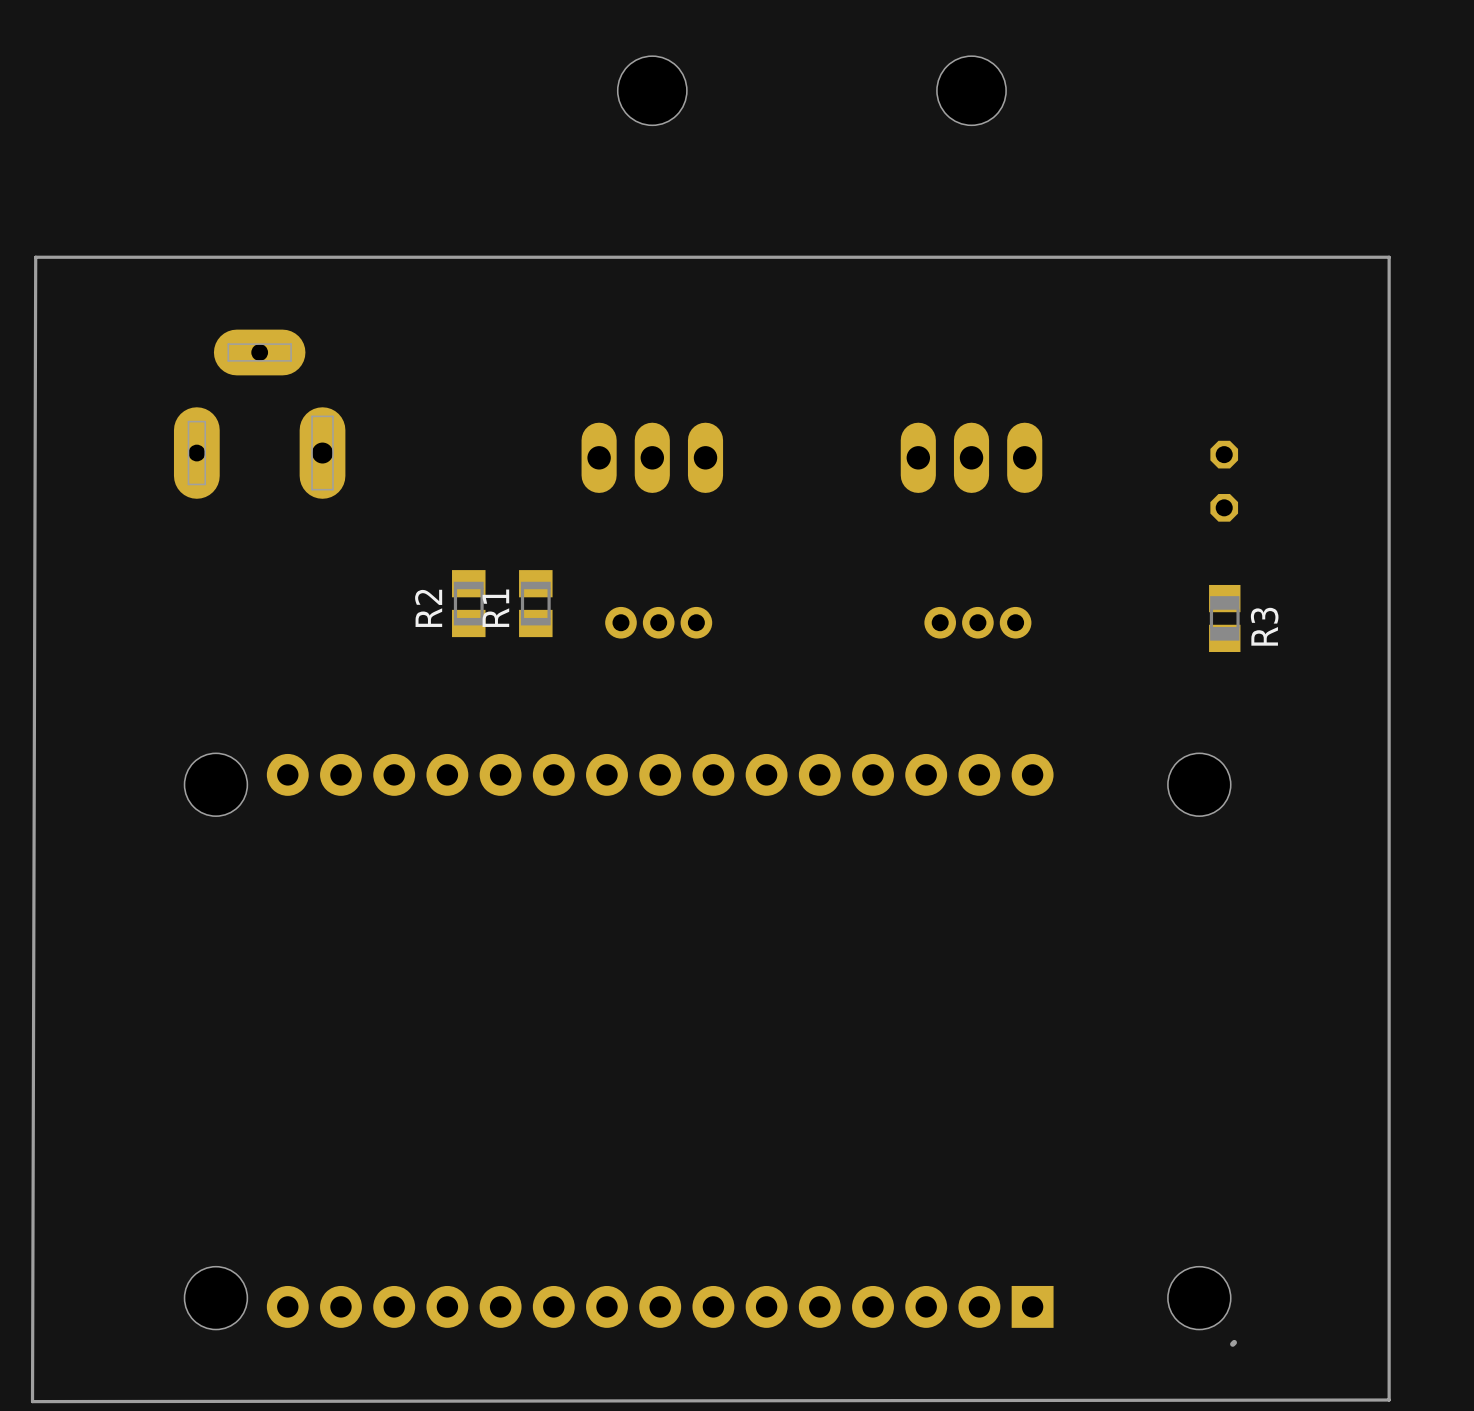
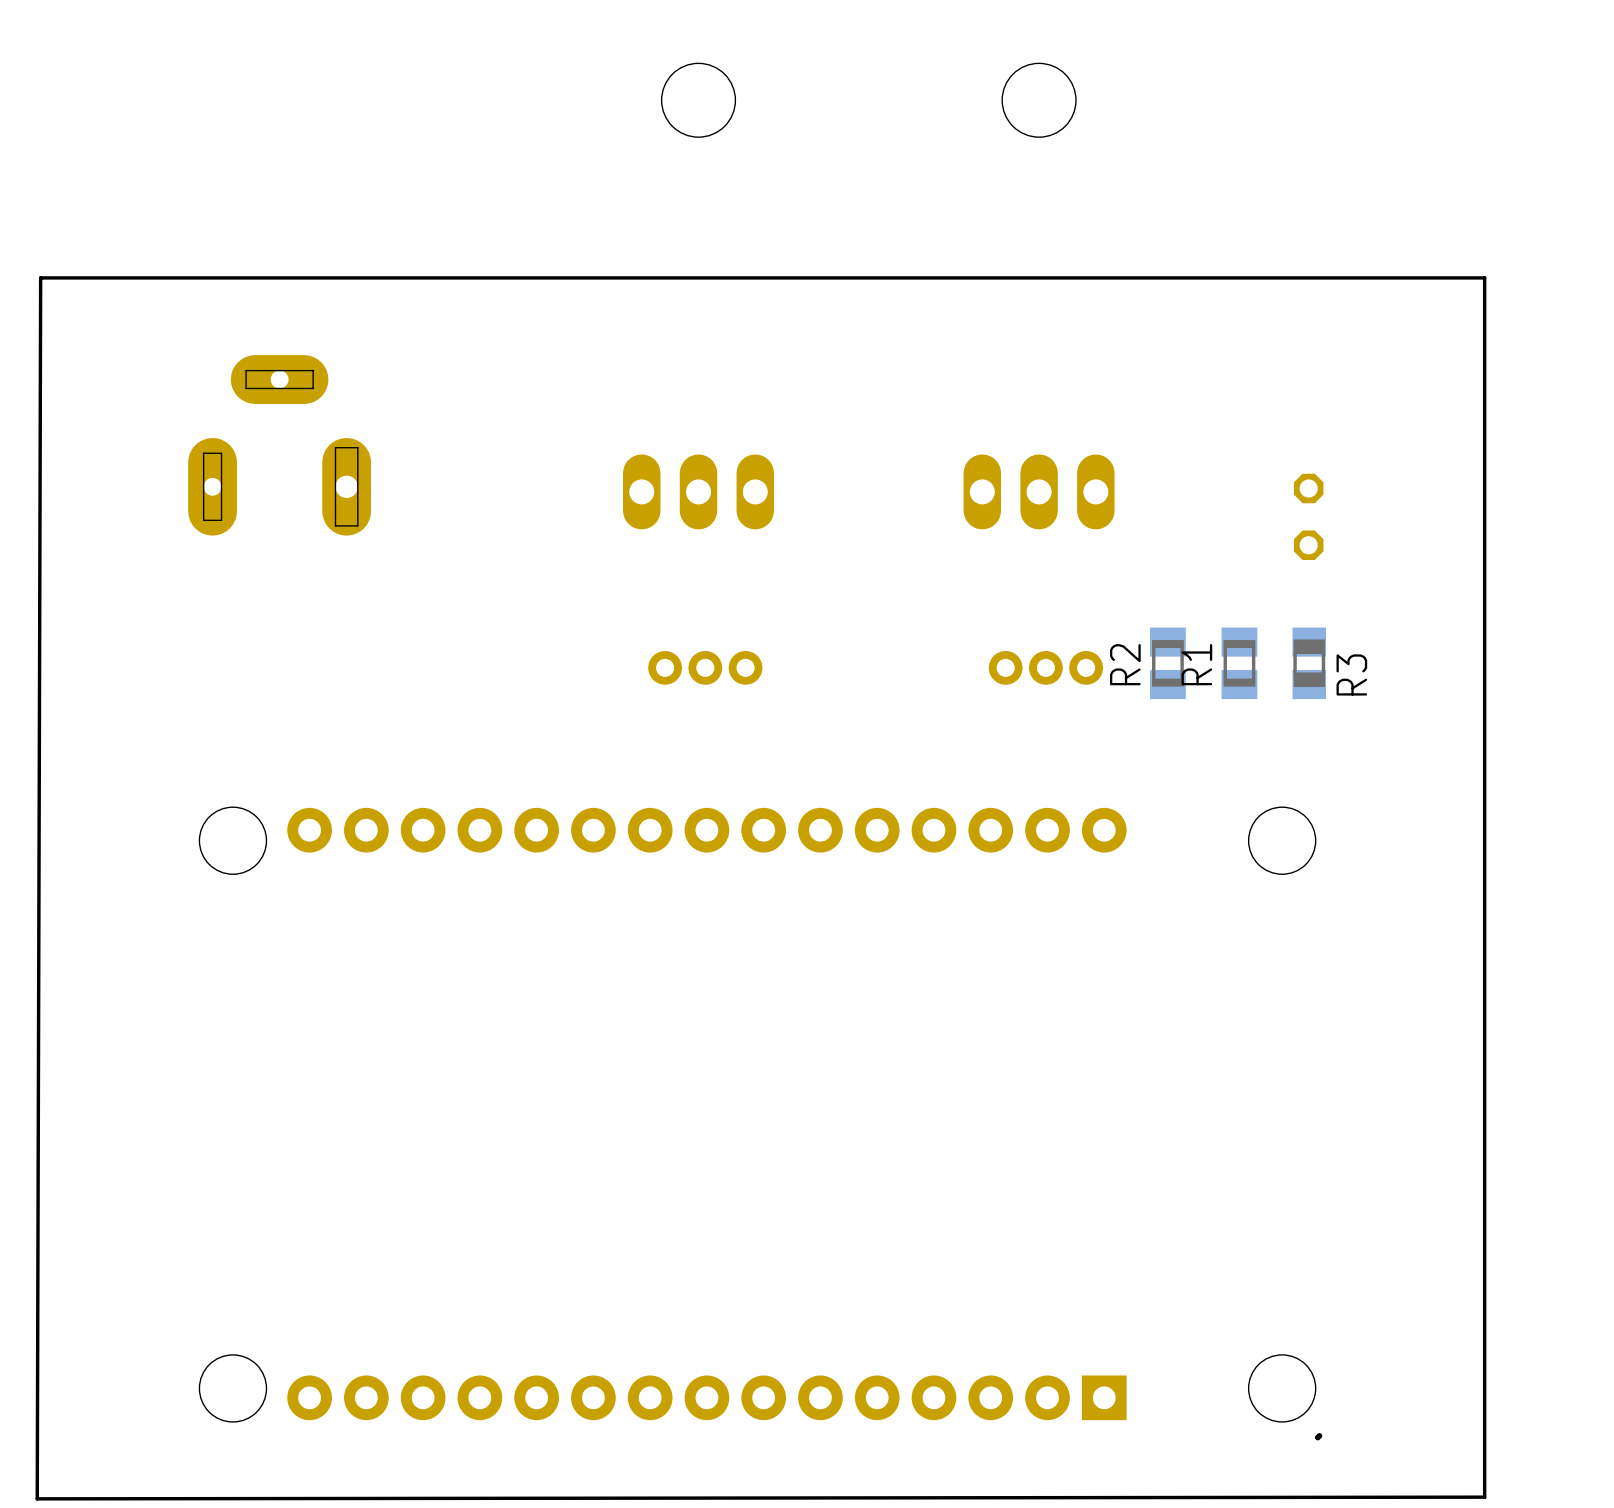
R2 position: (468, 603) -> (1167, 663)
R1 position: (535, 603) -> (1239, 663)

